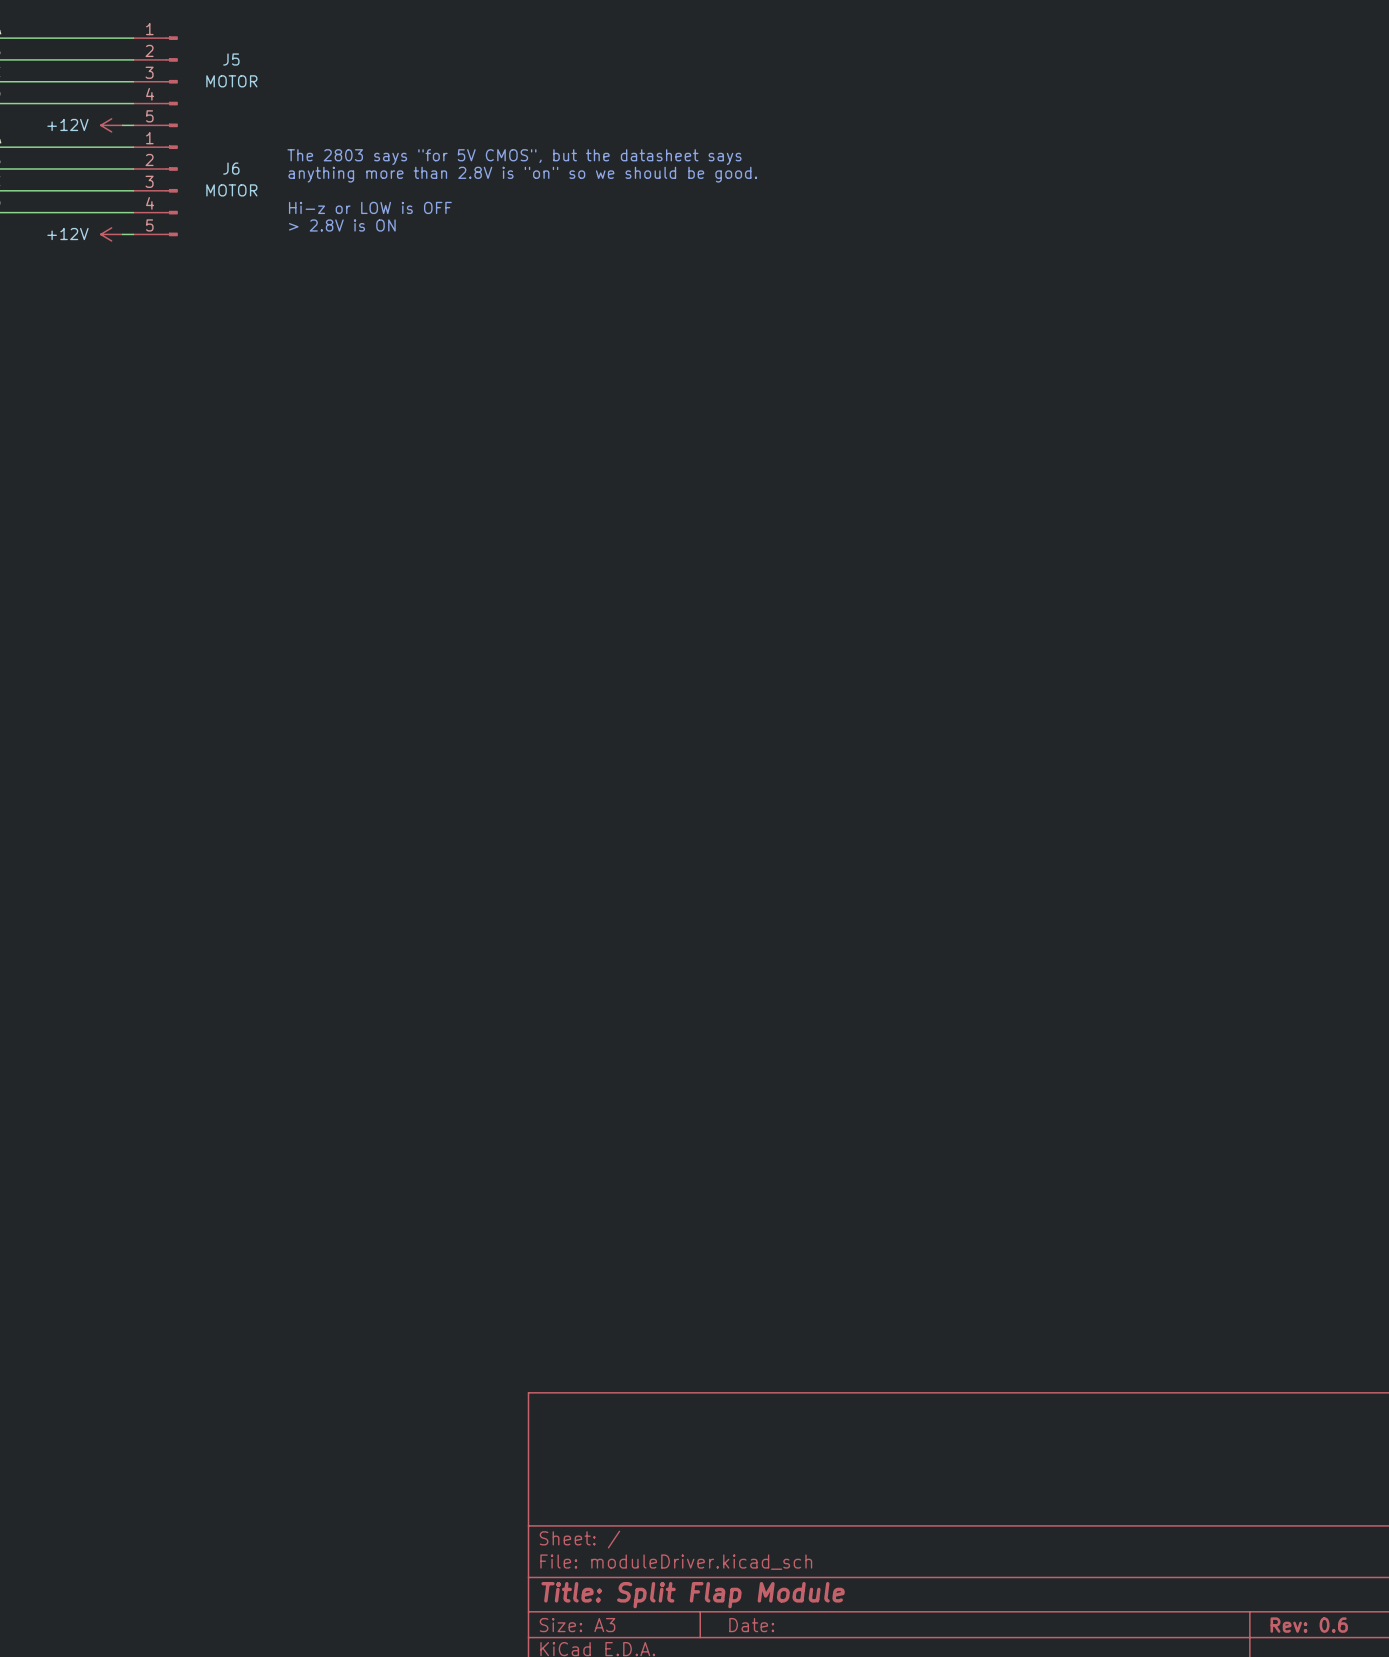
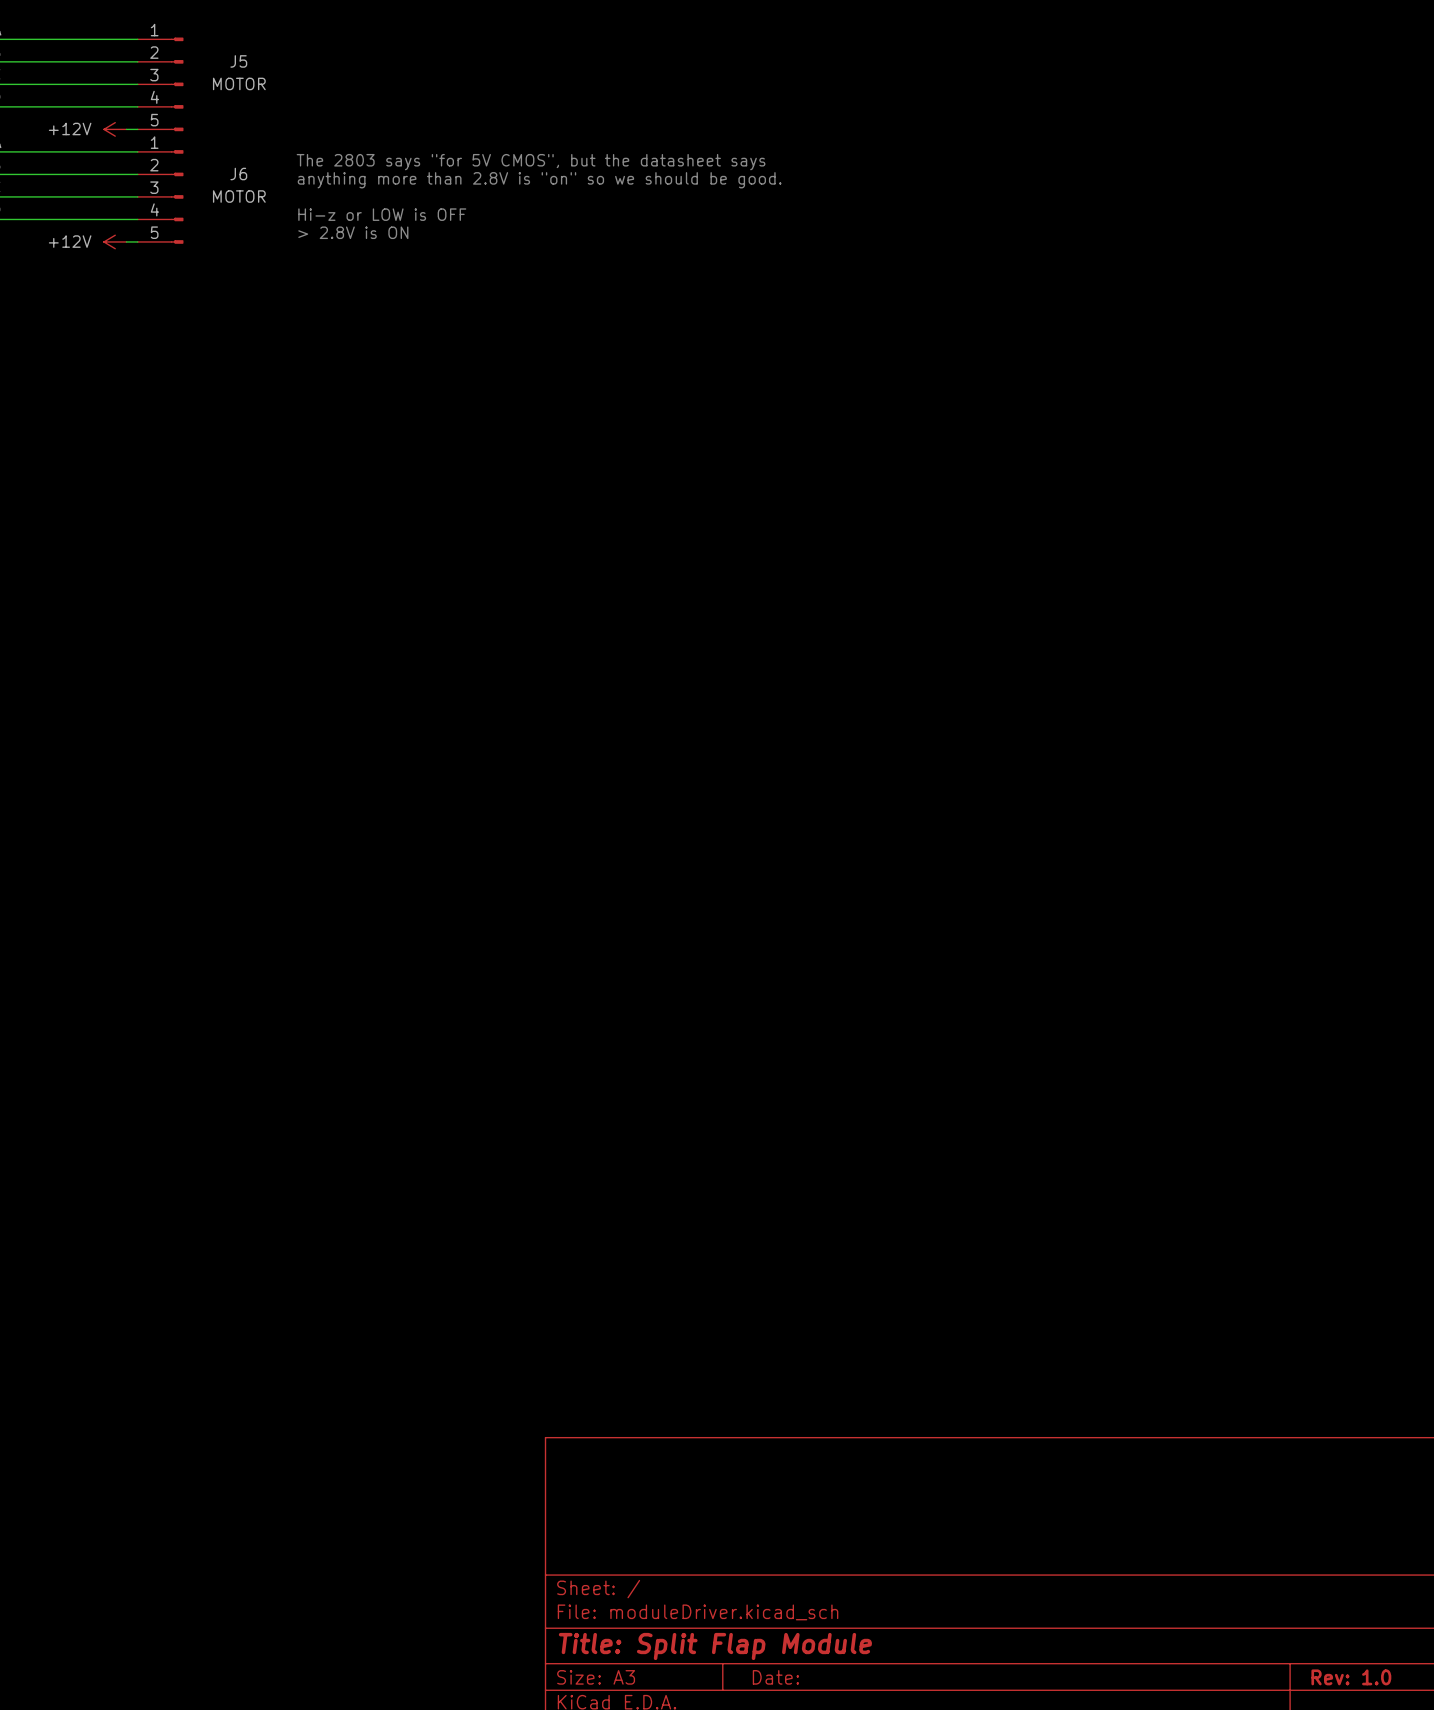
title block: Rev: 0.6 (1309, 1625) -> Rev: 1.0 (1351, 1677)

